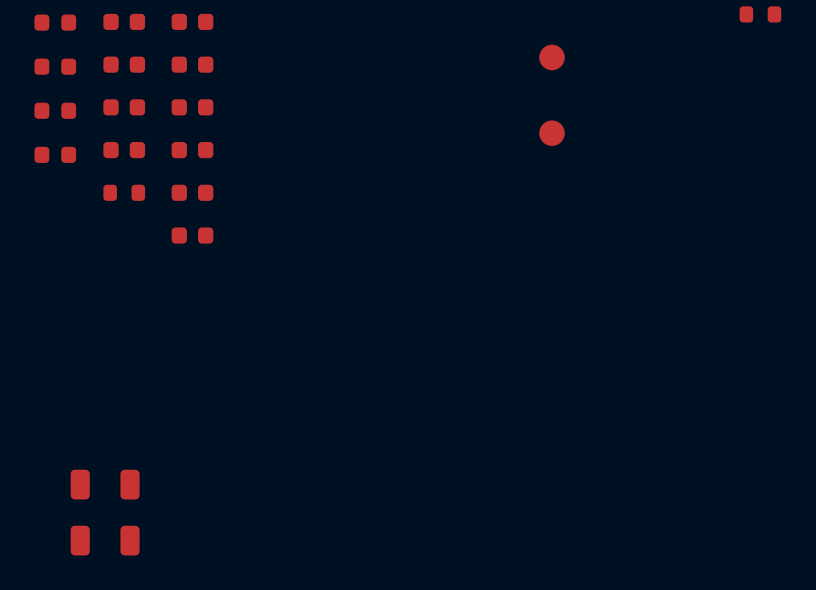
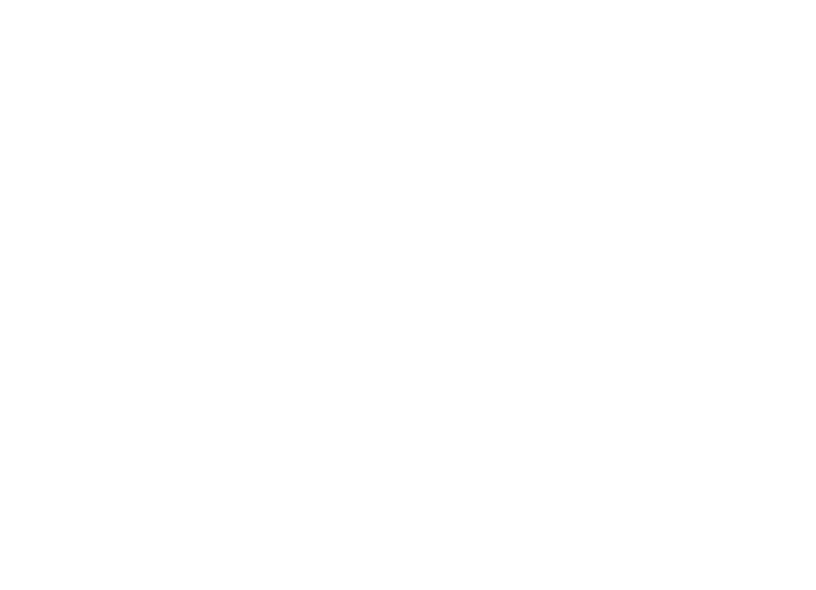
part: (760, 14) -> none
part: (124, 21) -> none
part: (192, 21) -> none
part: (55, 22) -> none
part: (552, 57) -> none
part: (124, 64) -> none
part: (192, 64) -> none
part: (55, 66) -> none
part: (124, 107) -> none
part: (192, 107) -> none
part: (55, 110) -> none
part: (552, 133) -> none
part: (124, 150) -> none
part: (192, 150) -> none
part: (55, 154) -> none
part: (124, 192) -> none
part: (192, 192) -> none
part: (192, 235) -> none
part: (105, 484) -> none
part: (105, 540) -> none

